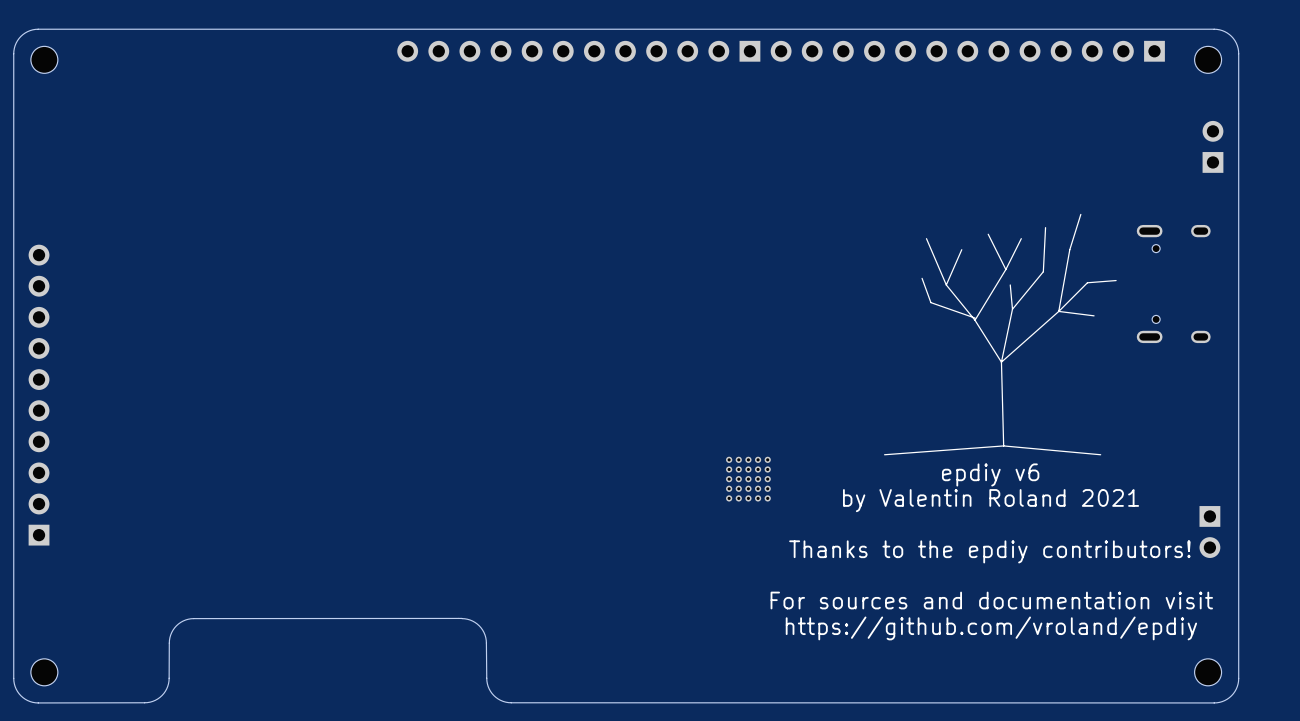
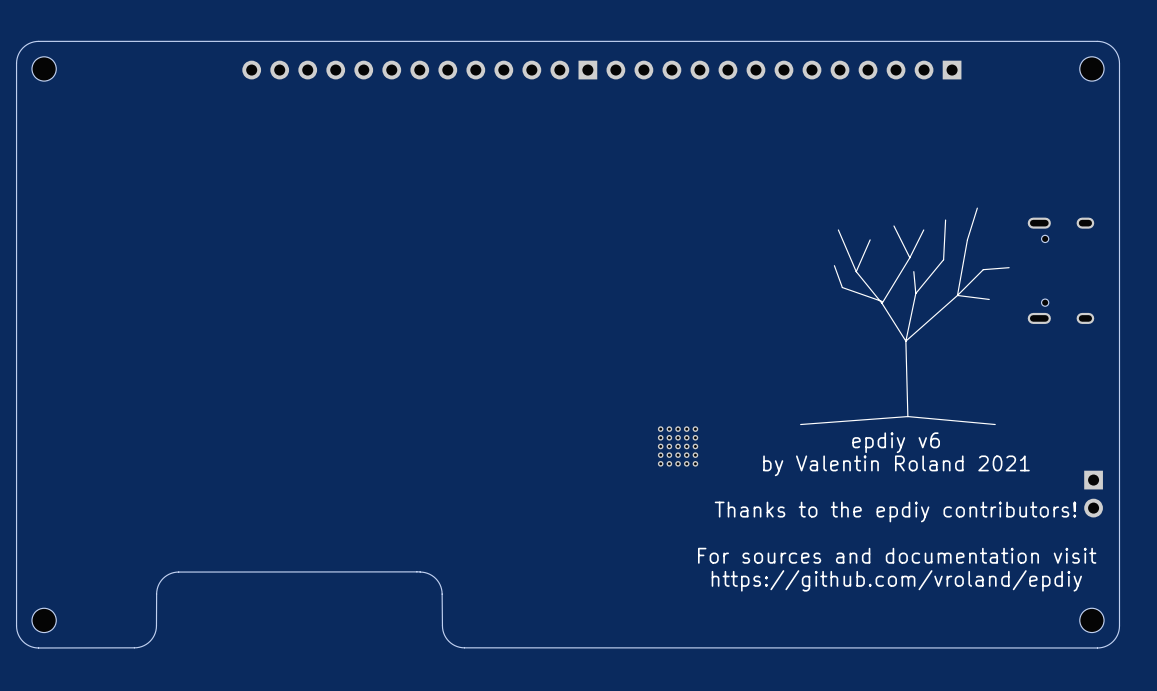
part: (578, 51) -> none
part position: (967, 51) -> (783, 70)
part: none -> (419, 70)
part: (1212, 146) -> none
part: (39, 395) -> none

